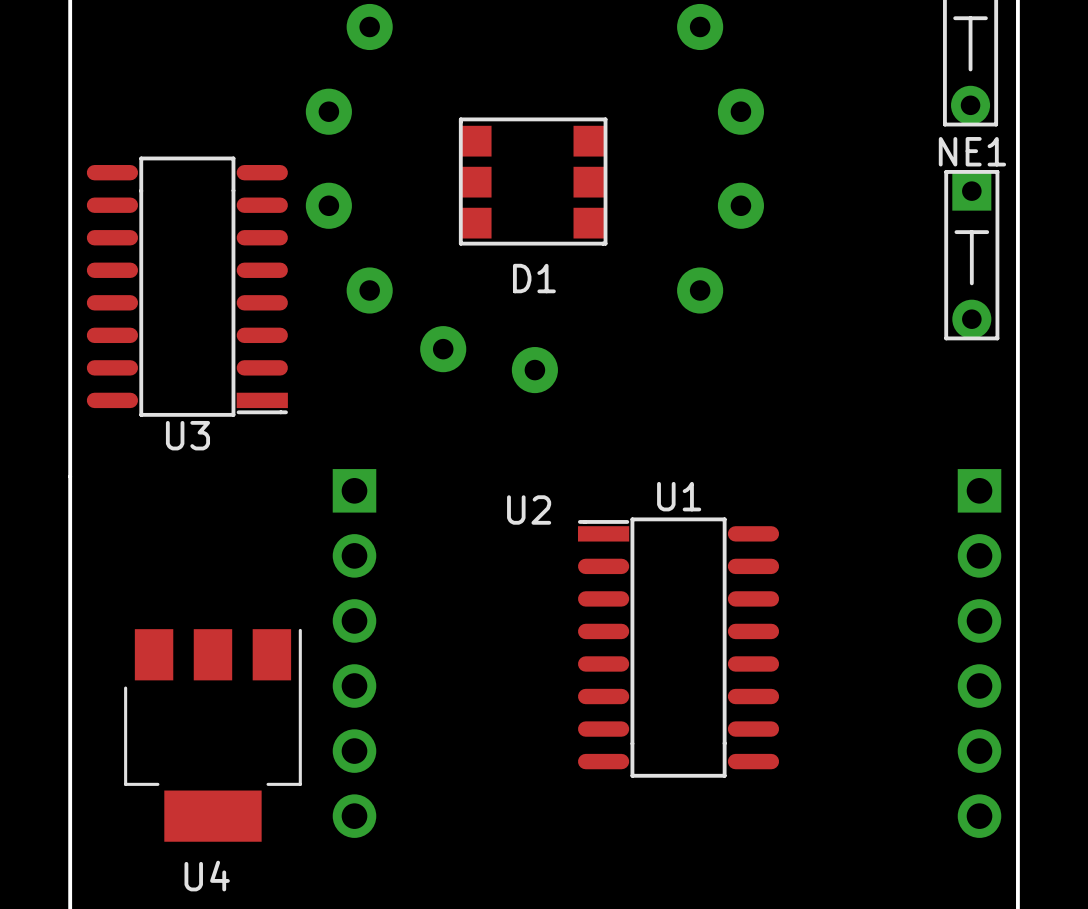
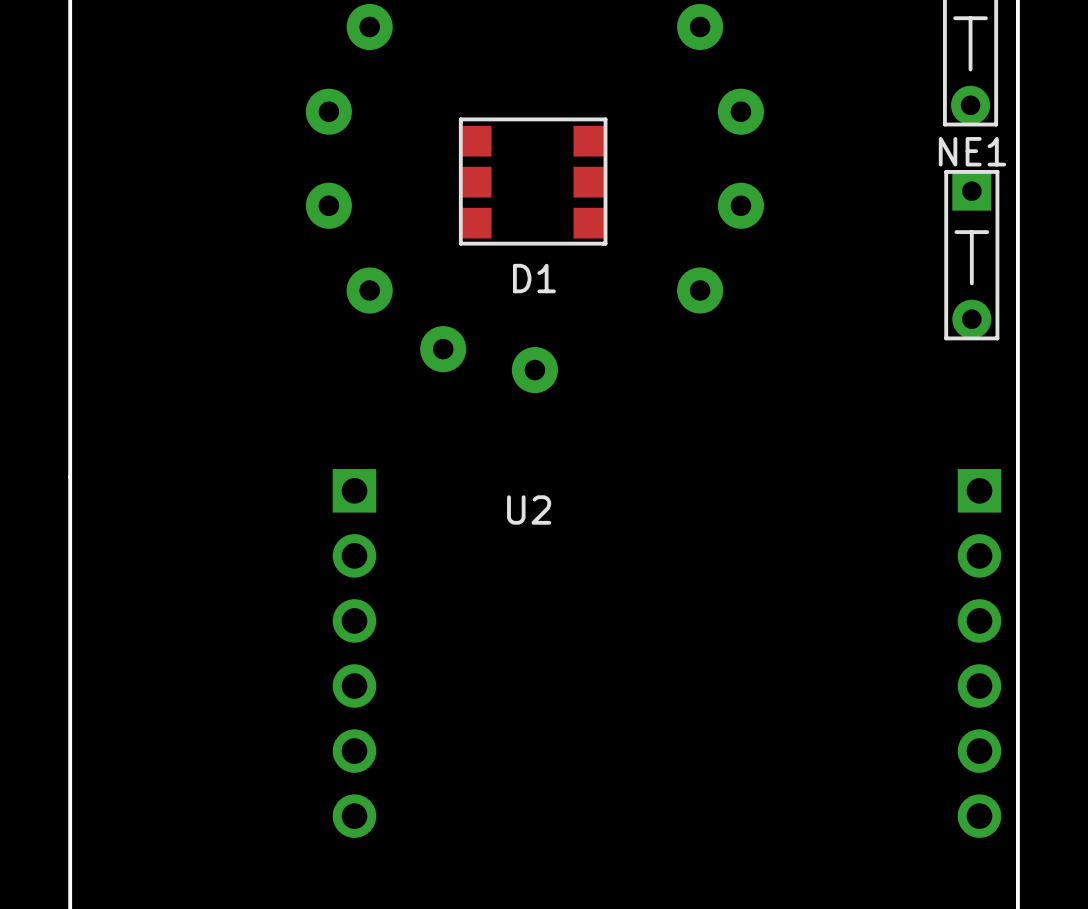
U3: (187, 286) -> none
U1: (678, 647) -> none
U4: (212, 735) -> none

